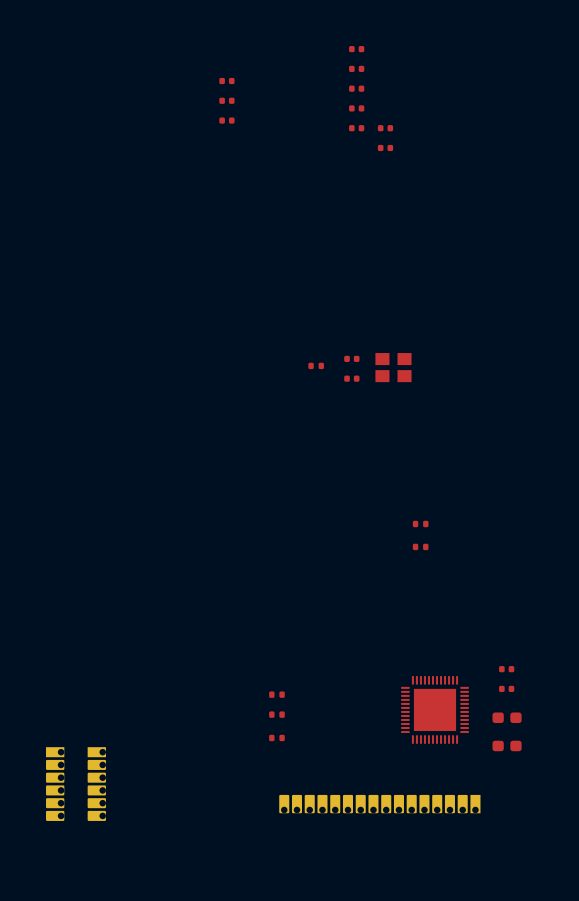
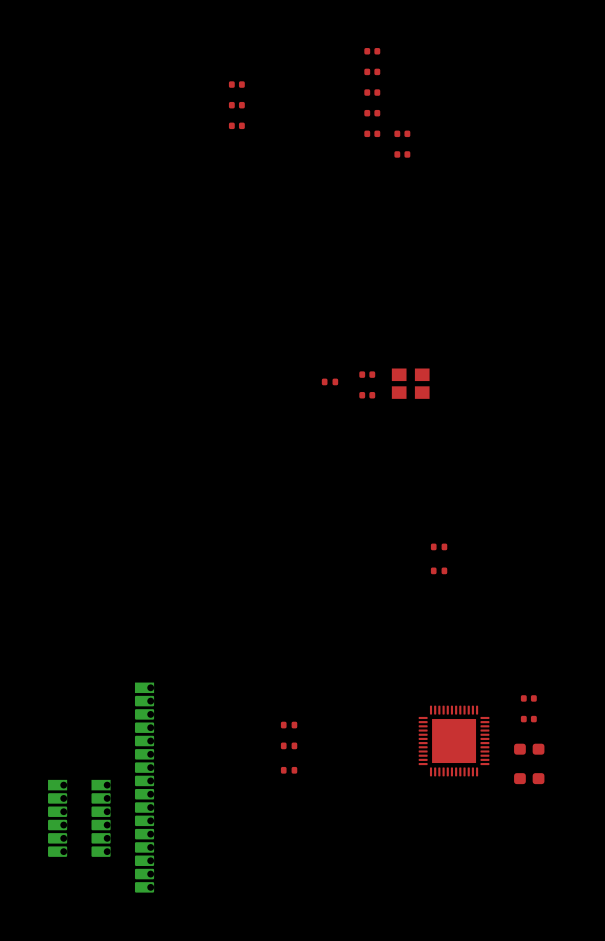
part rotation: 0° (379, 804) -> 90° counterclockwise (144, 787)
part position: (379, 804) -> (144, 787)

